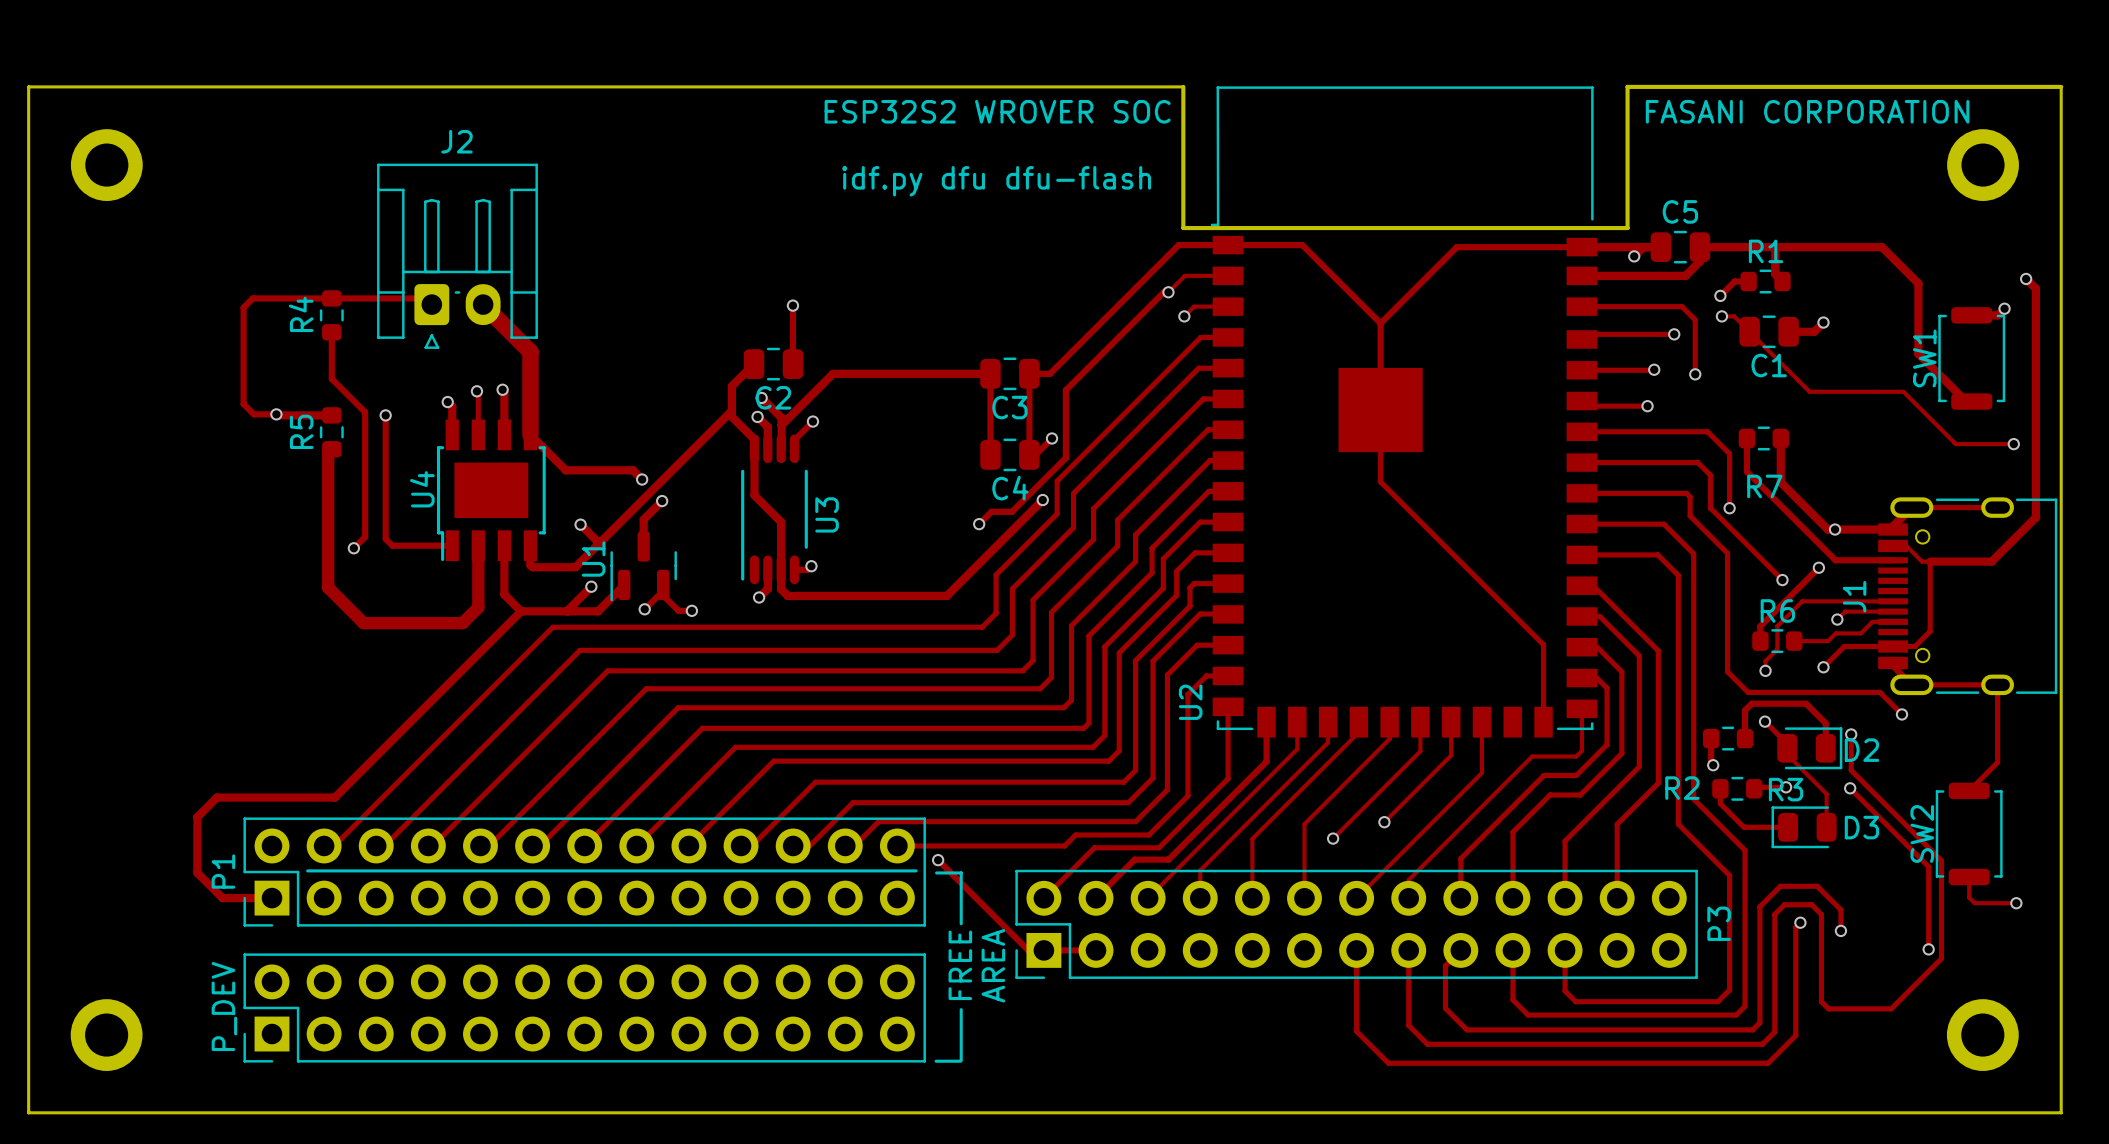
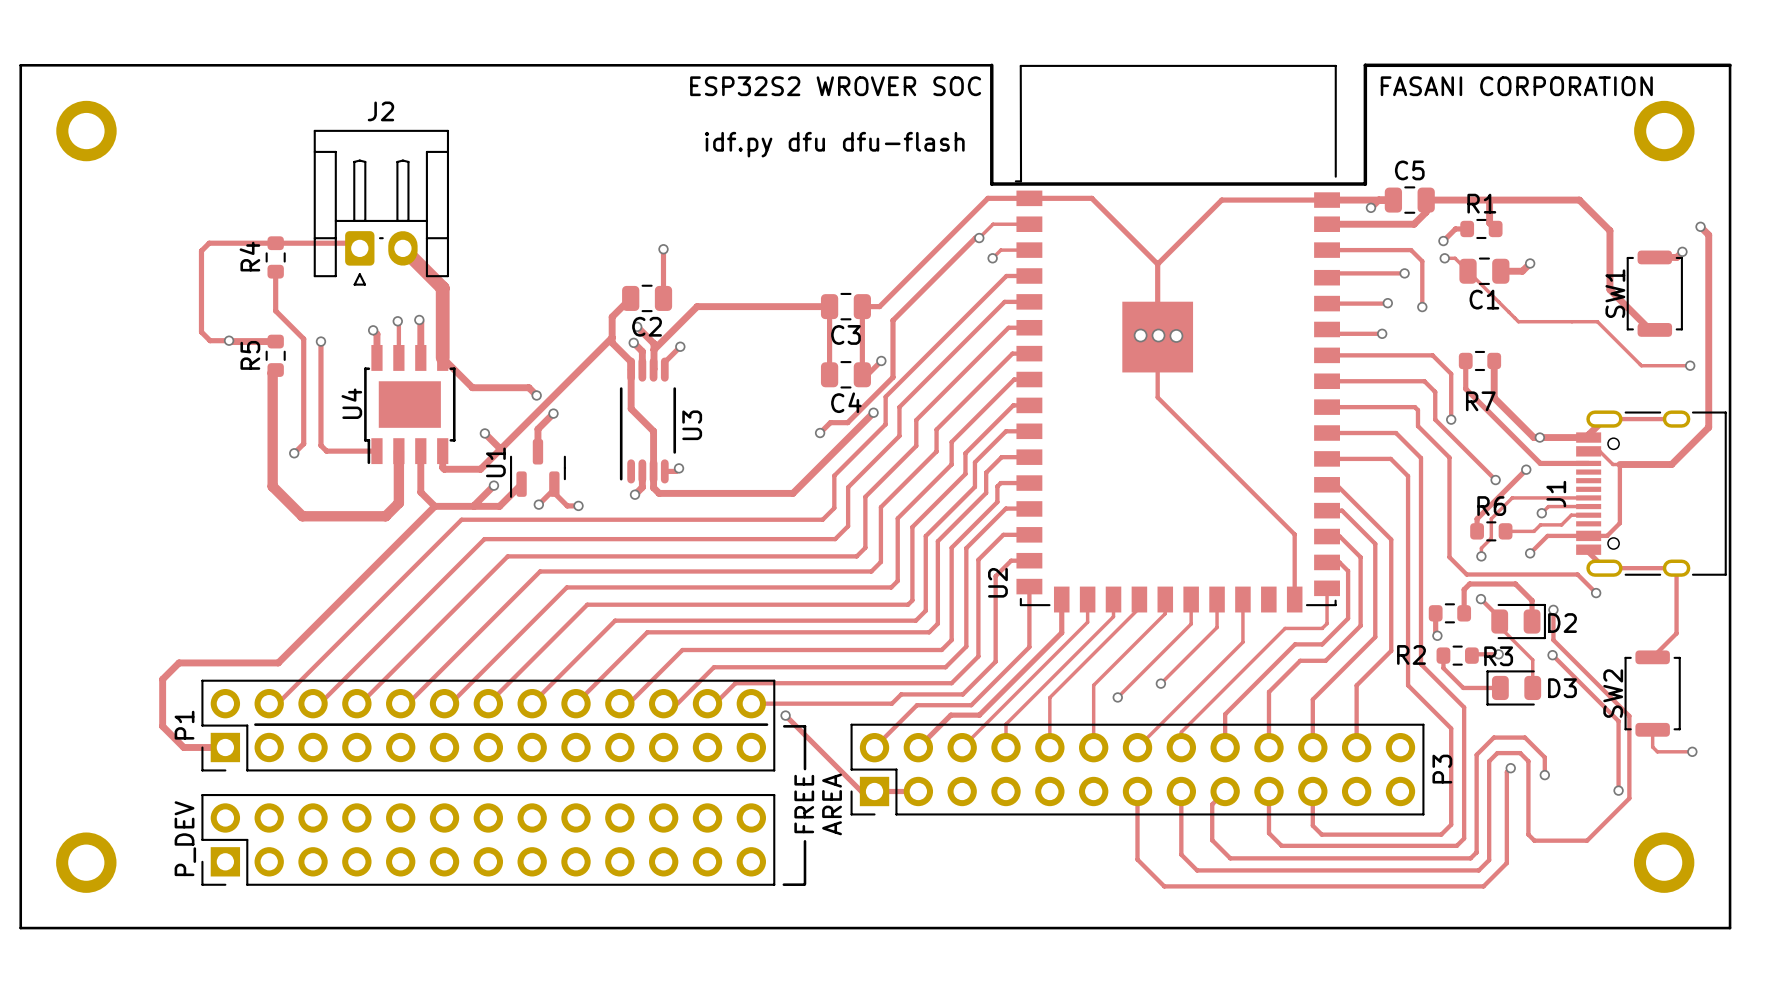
via: none -> (1140, 335)
via: none -> (1158, 335)
via: none -> (1176, 335)

